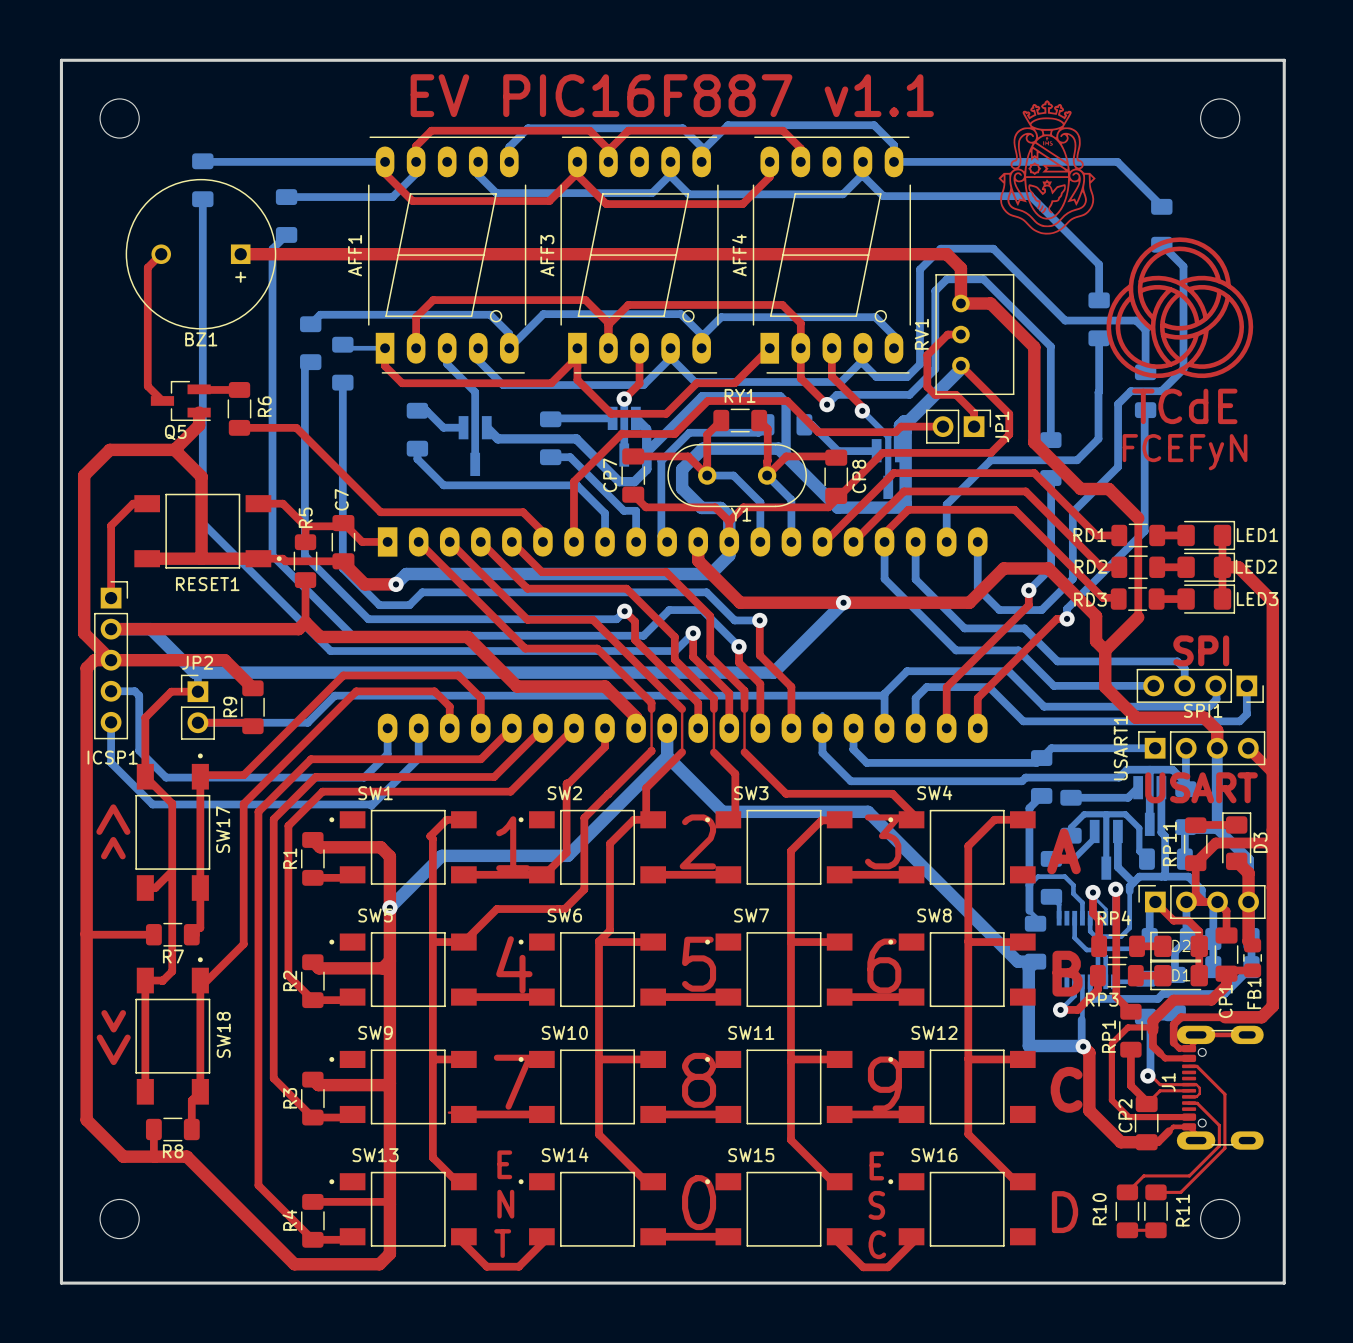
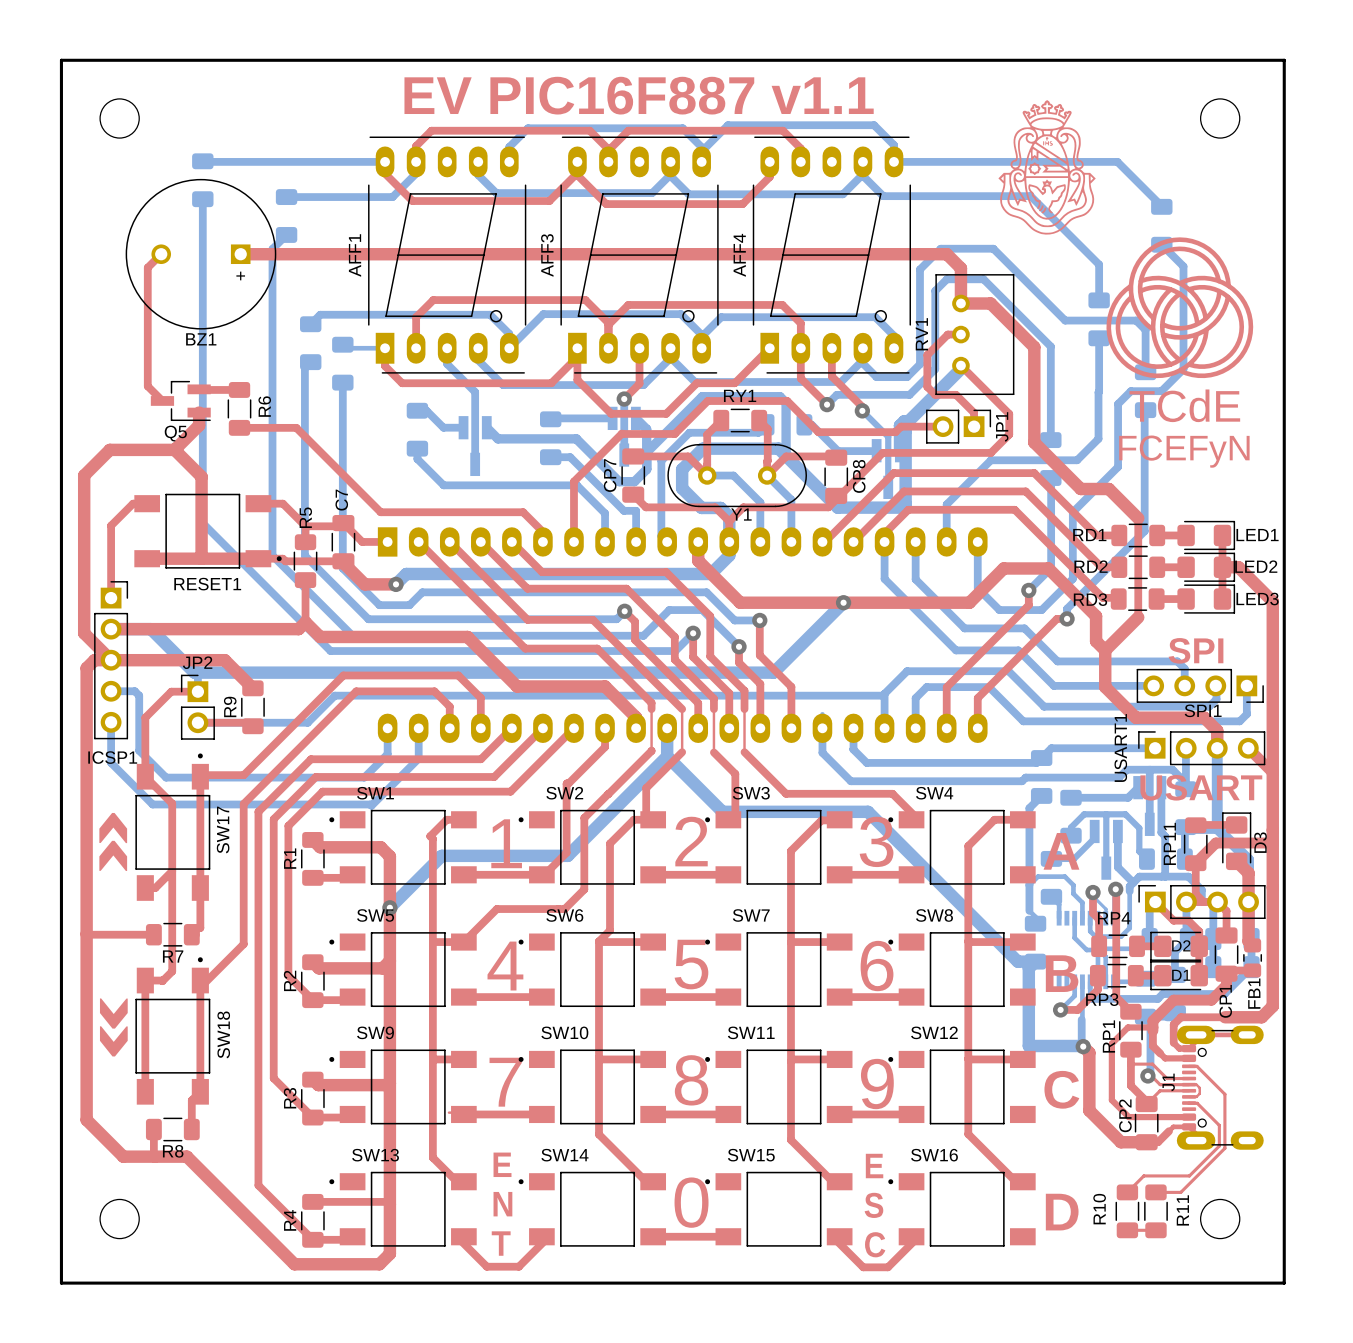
top track: none -> (1130, 1064) (1152, 1064) (1166, 1078) (1189, 1078)

